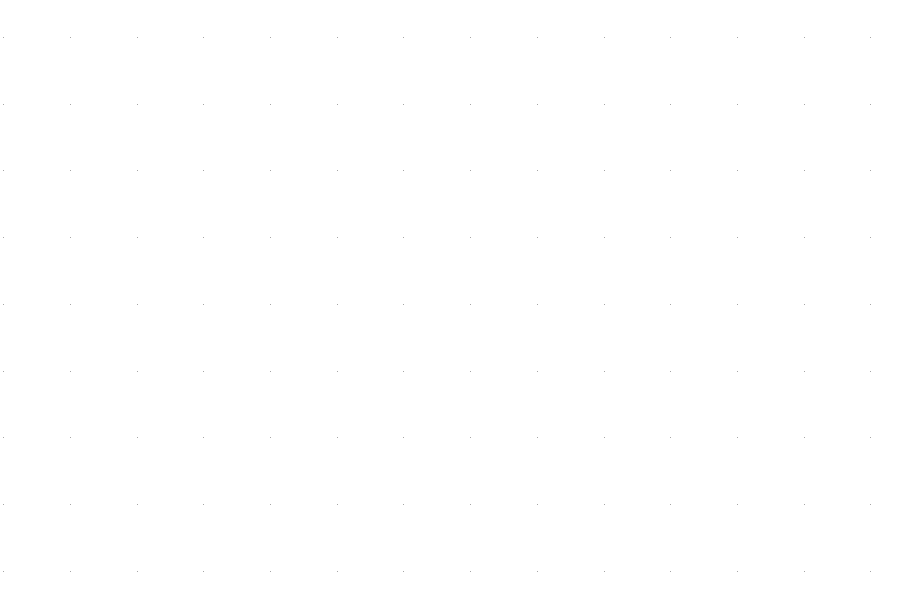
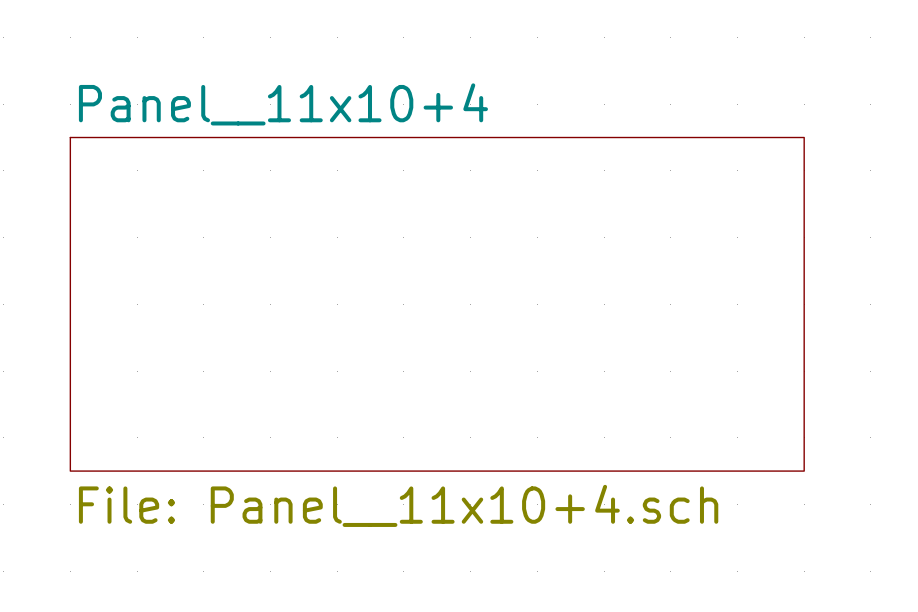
sheet Panel__11x10+4: none -> File: Panel__11x10+4.sch (437, 304)

